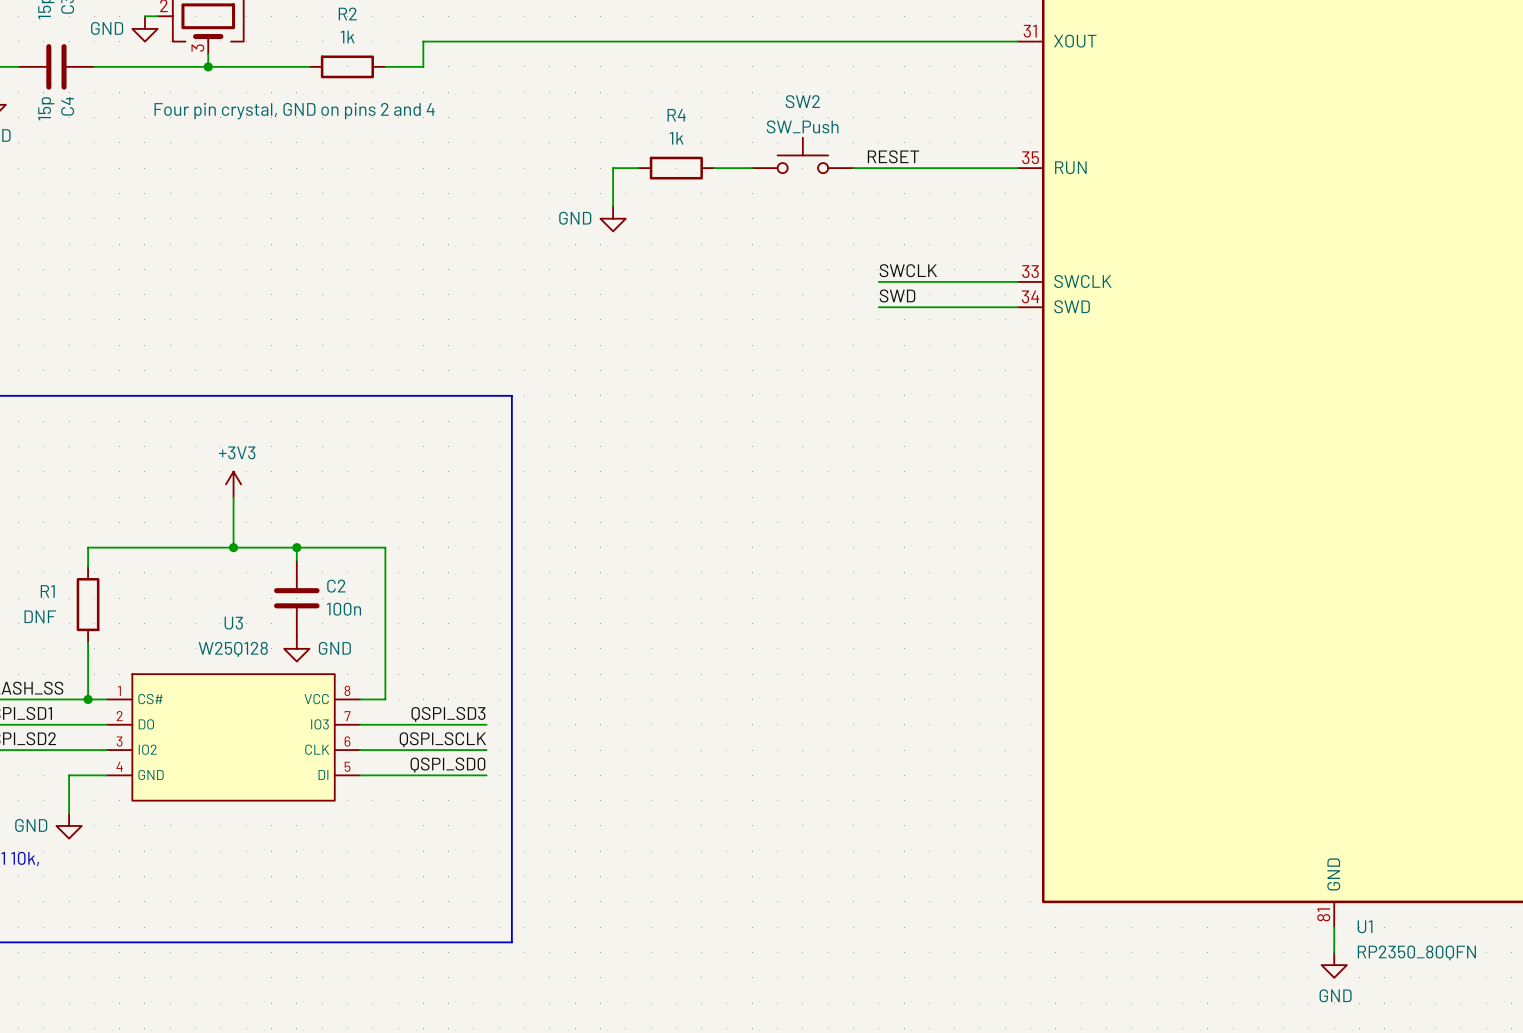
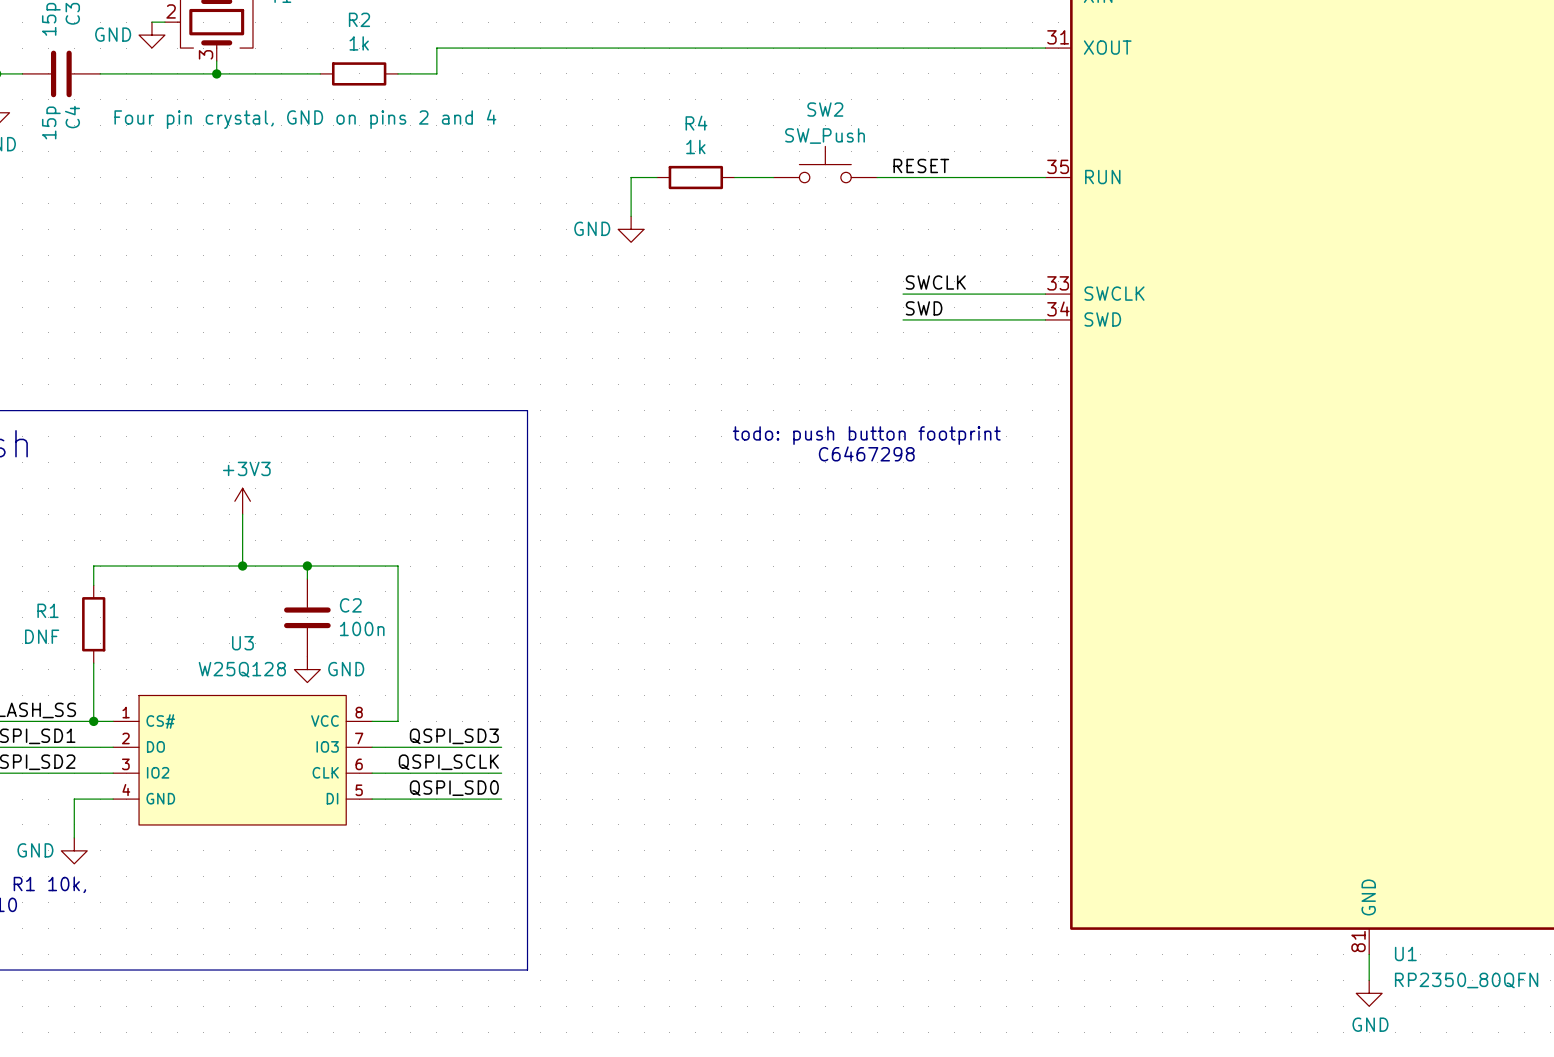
text: none -> todo: push button footprint (866, 435)
text: none -> C6467298 (866, 453)

